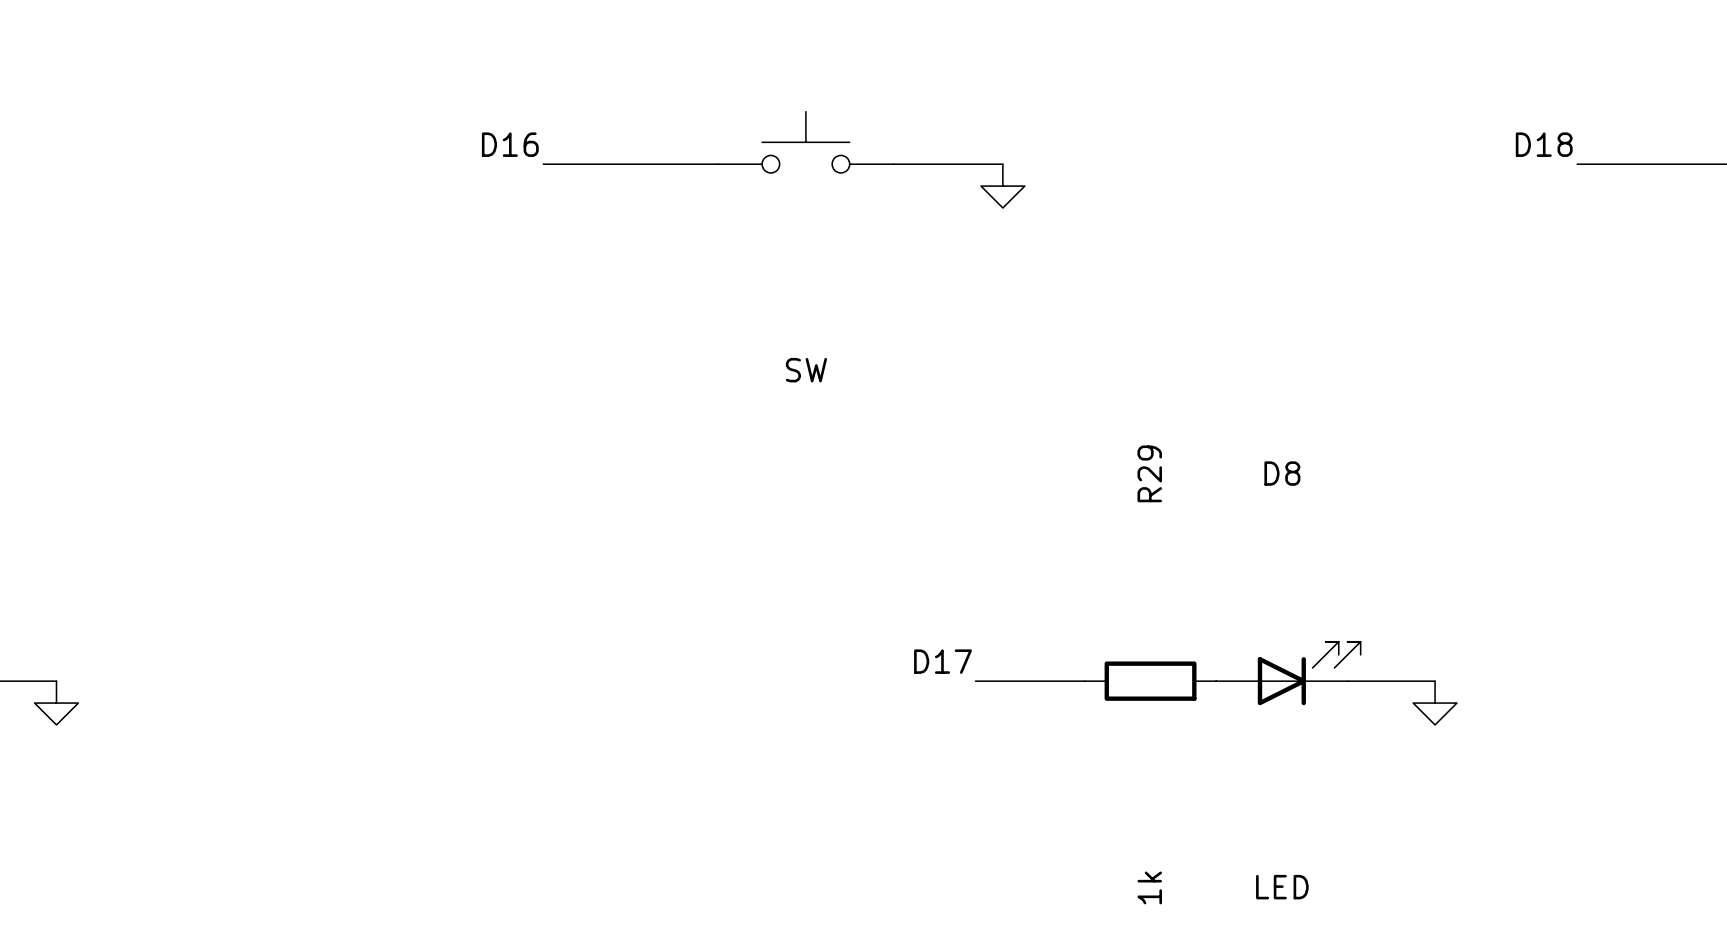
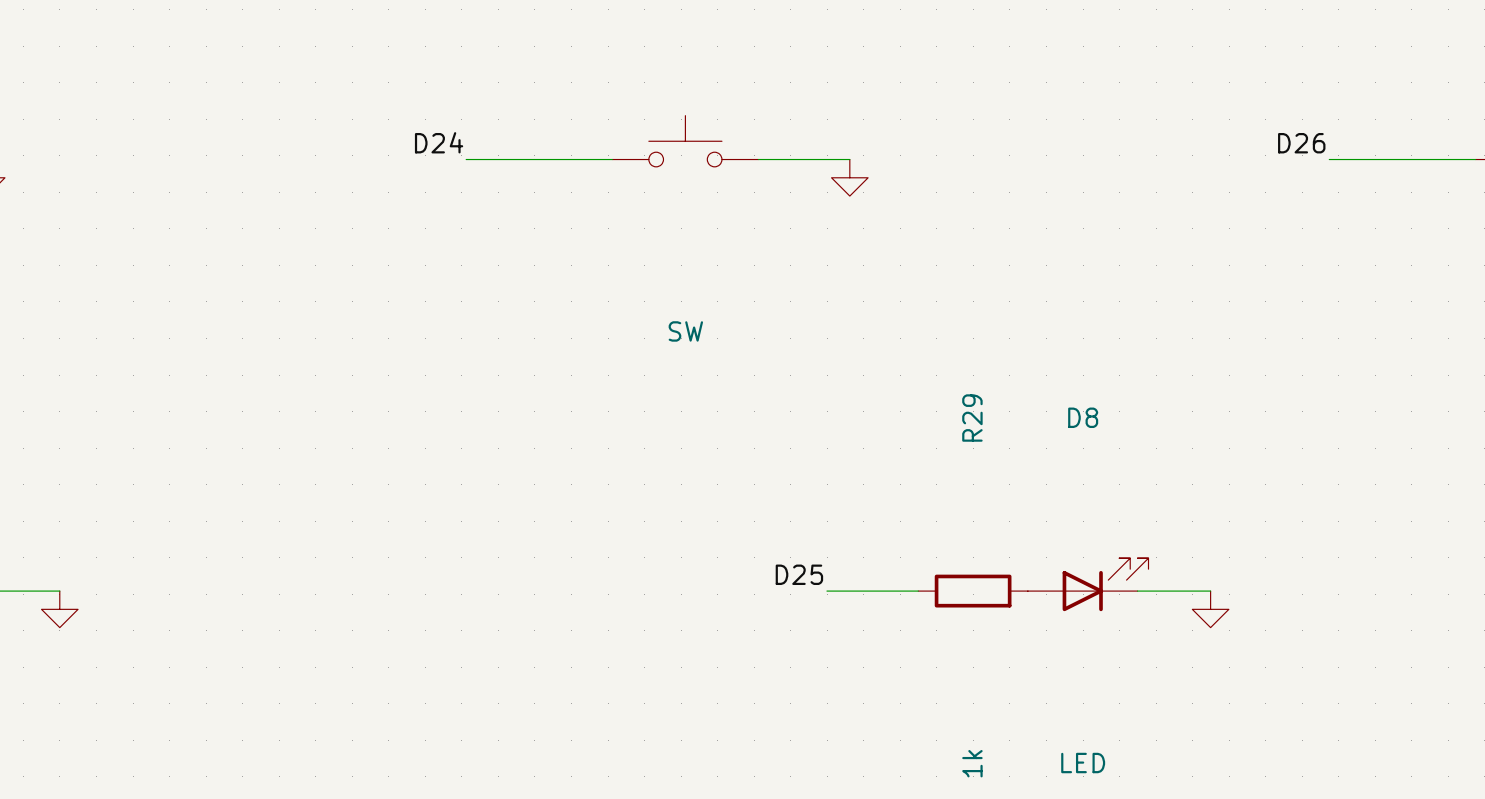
label: D16 (510, 144) -> D24 (439, 142)
label: D18 (1544, 144) -> D26 (1301, 143)
label: D17 (943, 661) -> D25 (799, 574)

